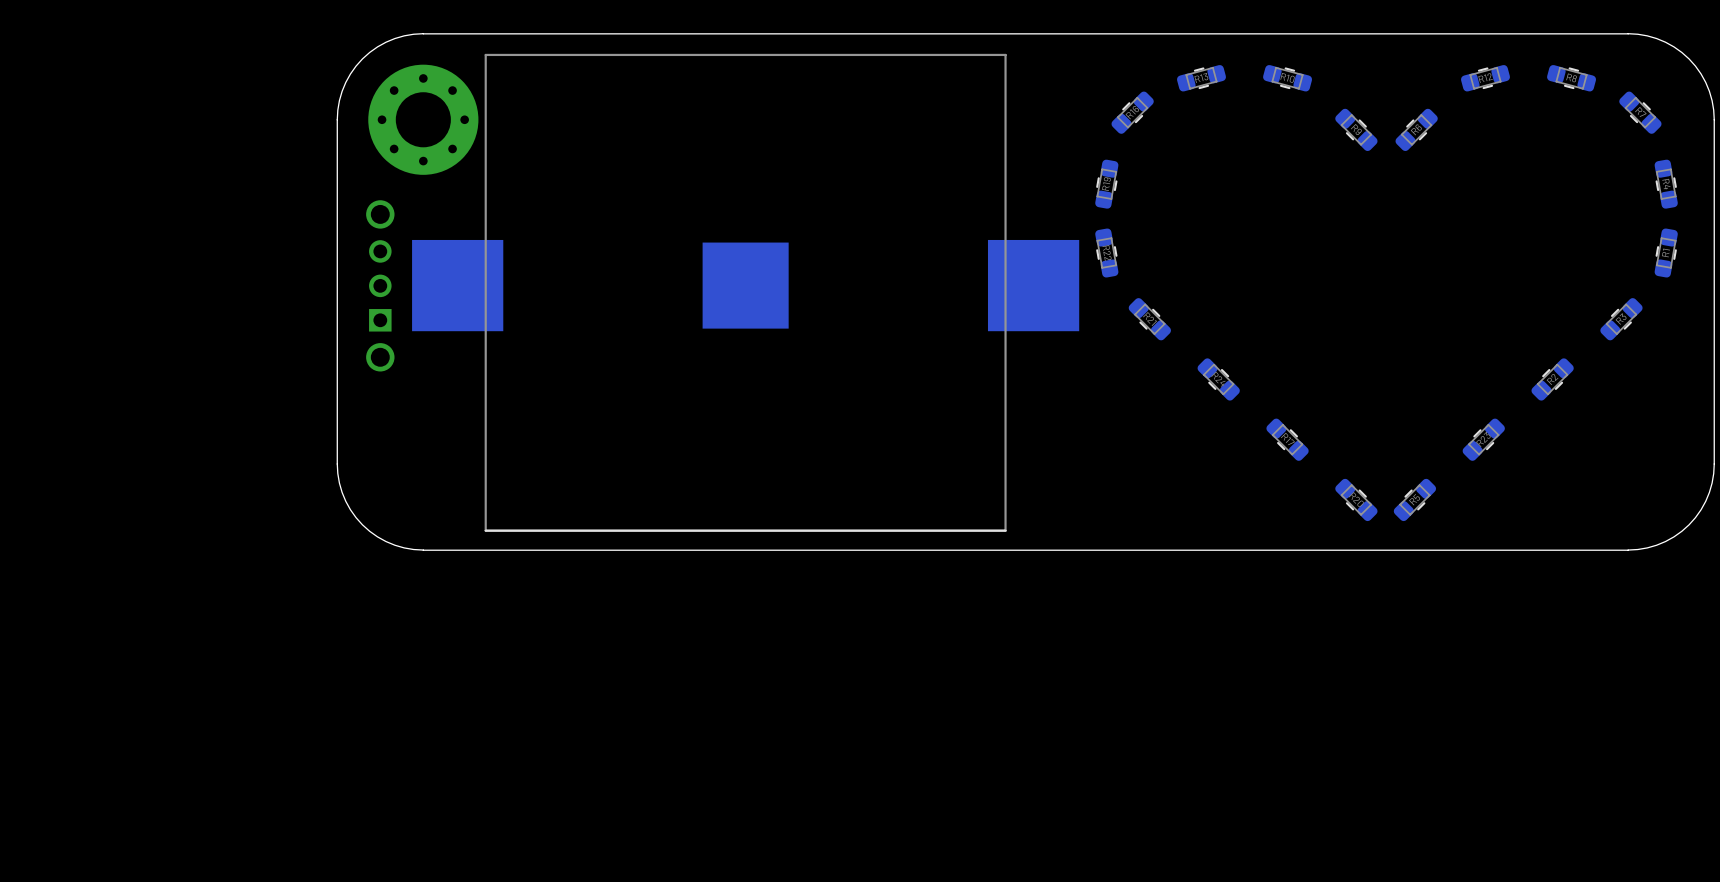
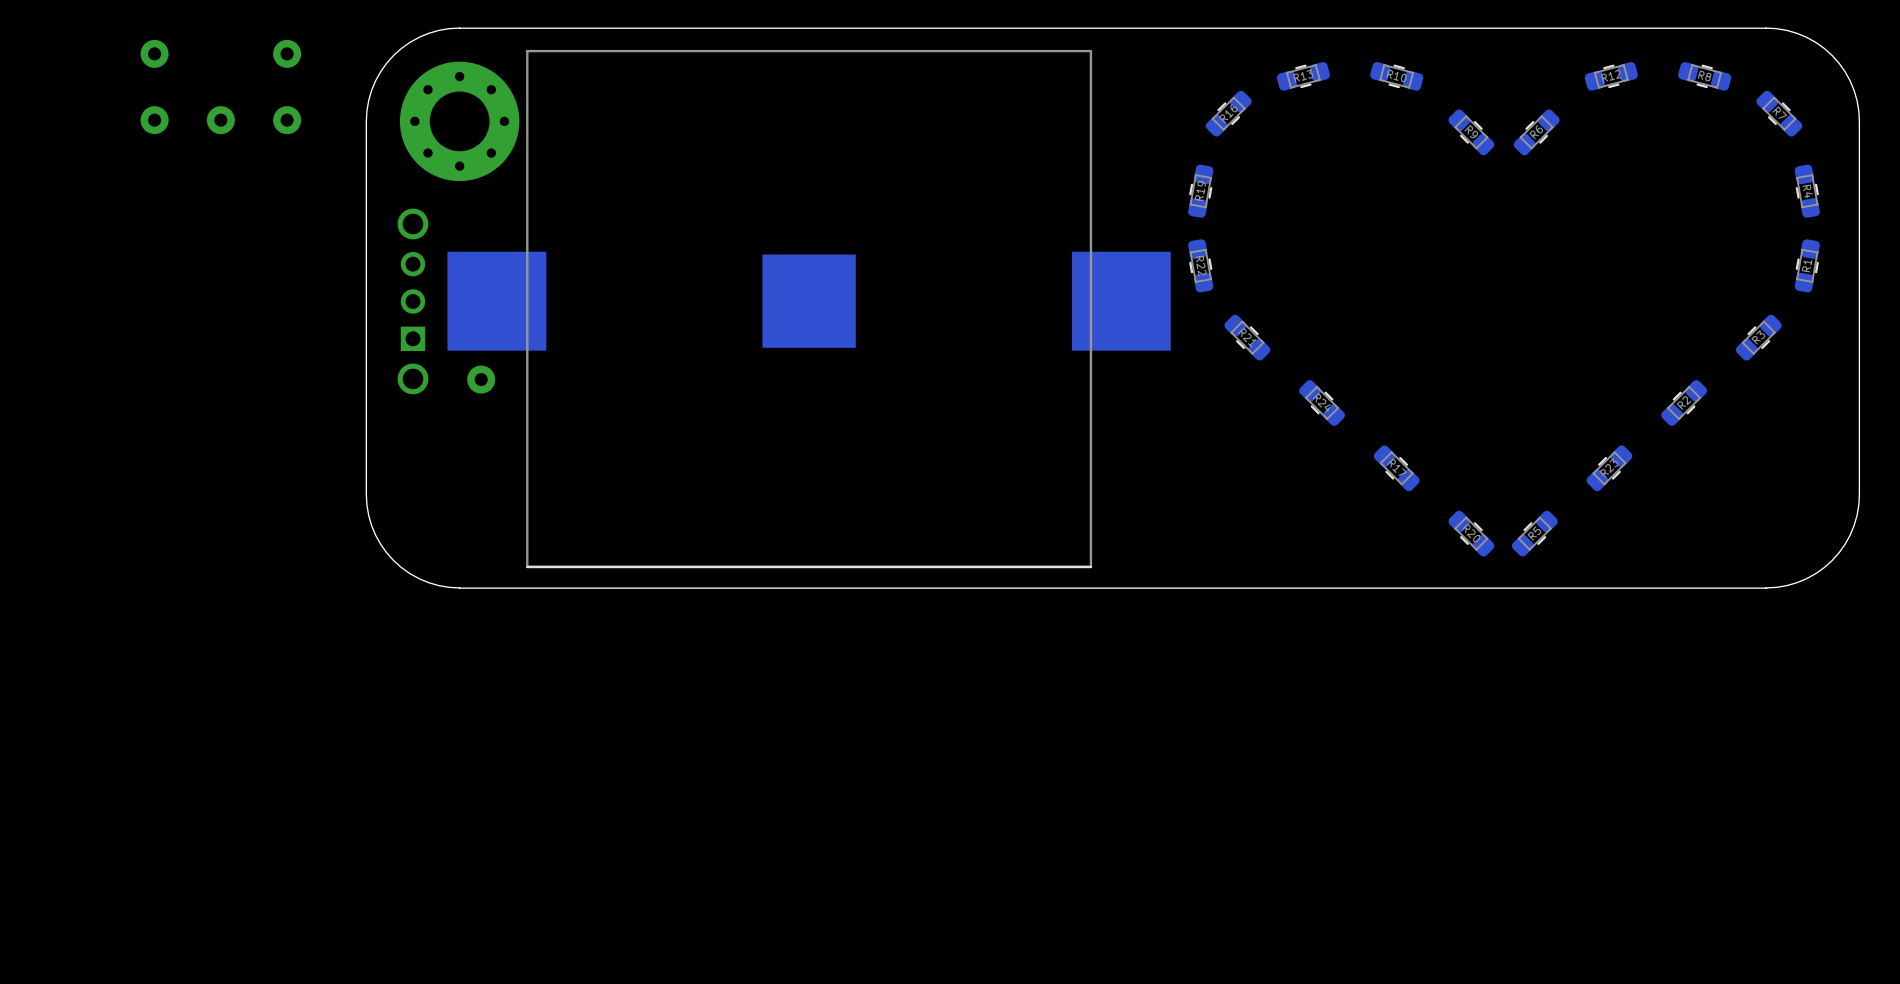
part: none -> (154, 53)
part: none -> (287, 53)
part: none -> (154, 120)
part: none -> (220, 120)
part: none -> (287, 120)
part: none -> (481, 379)

